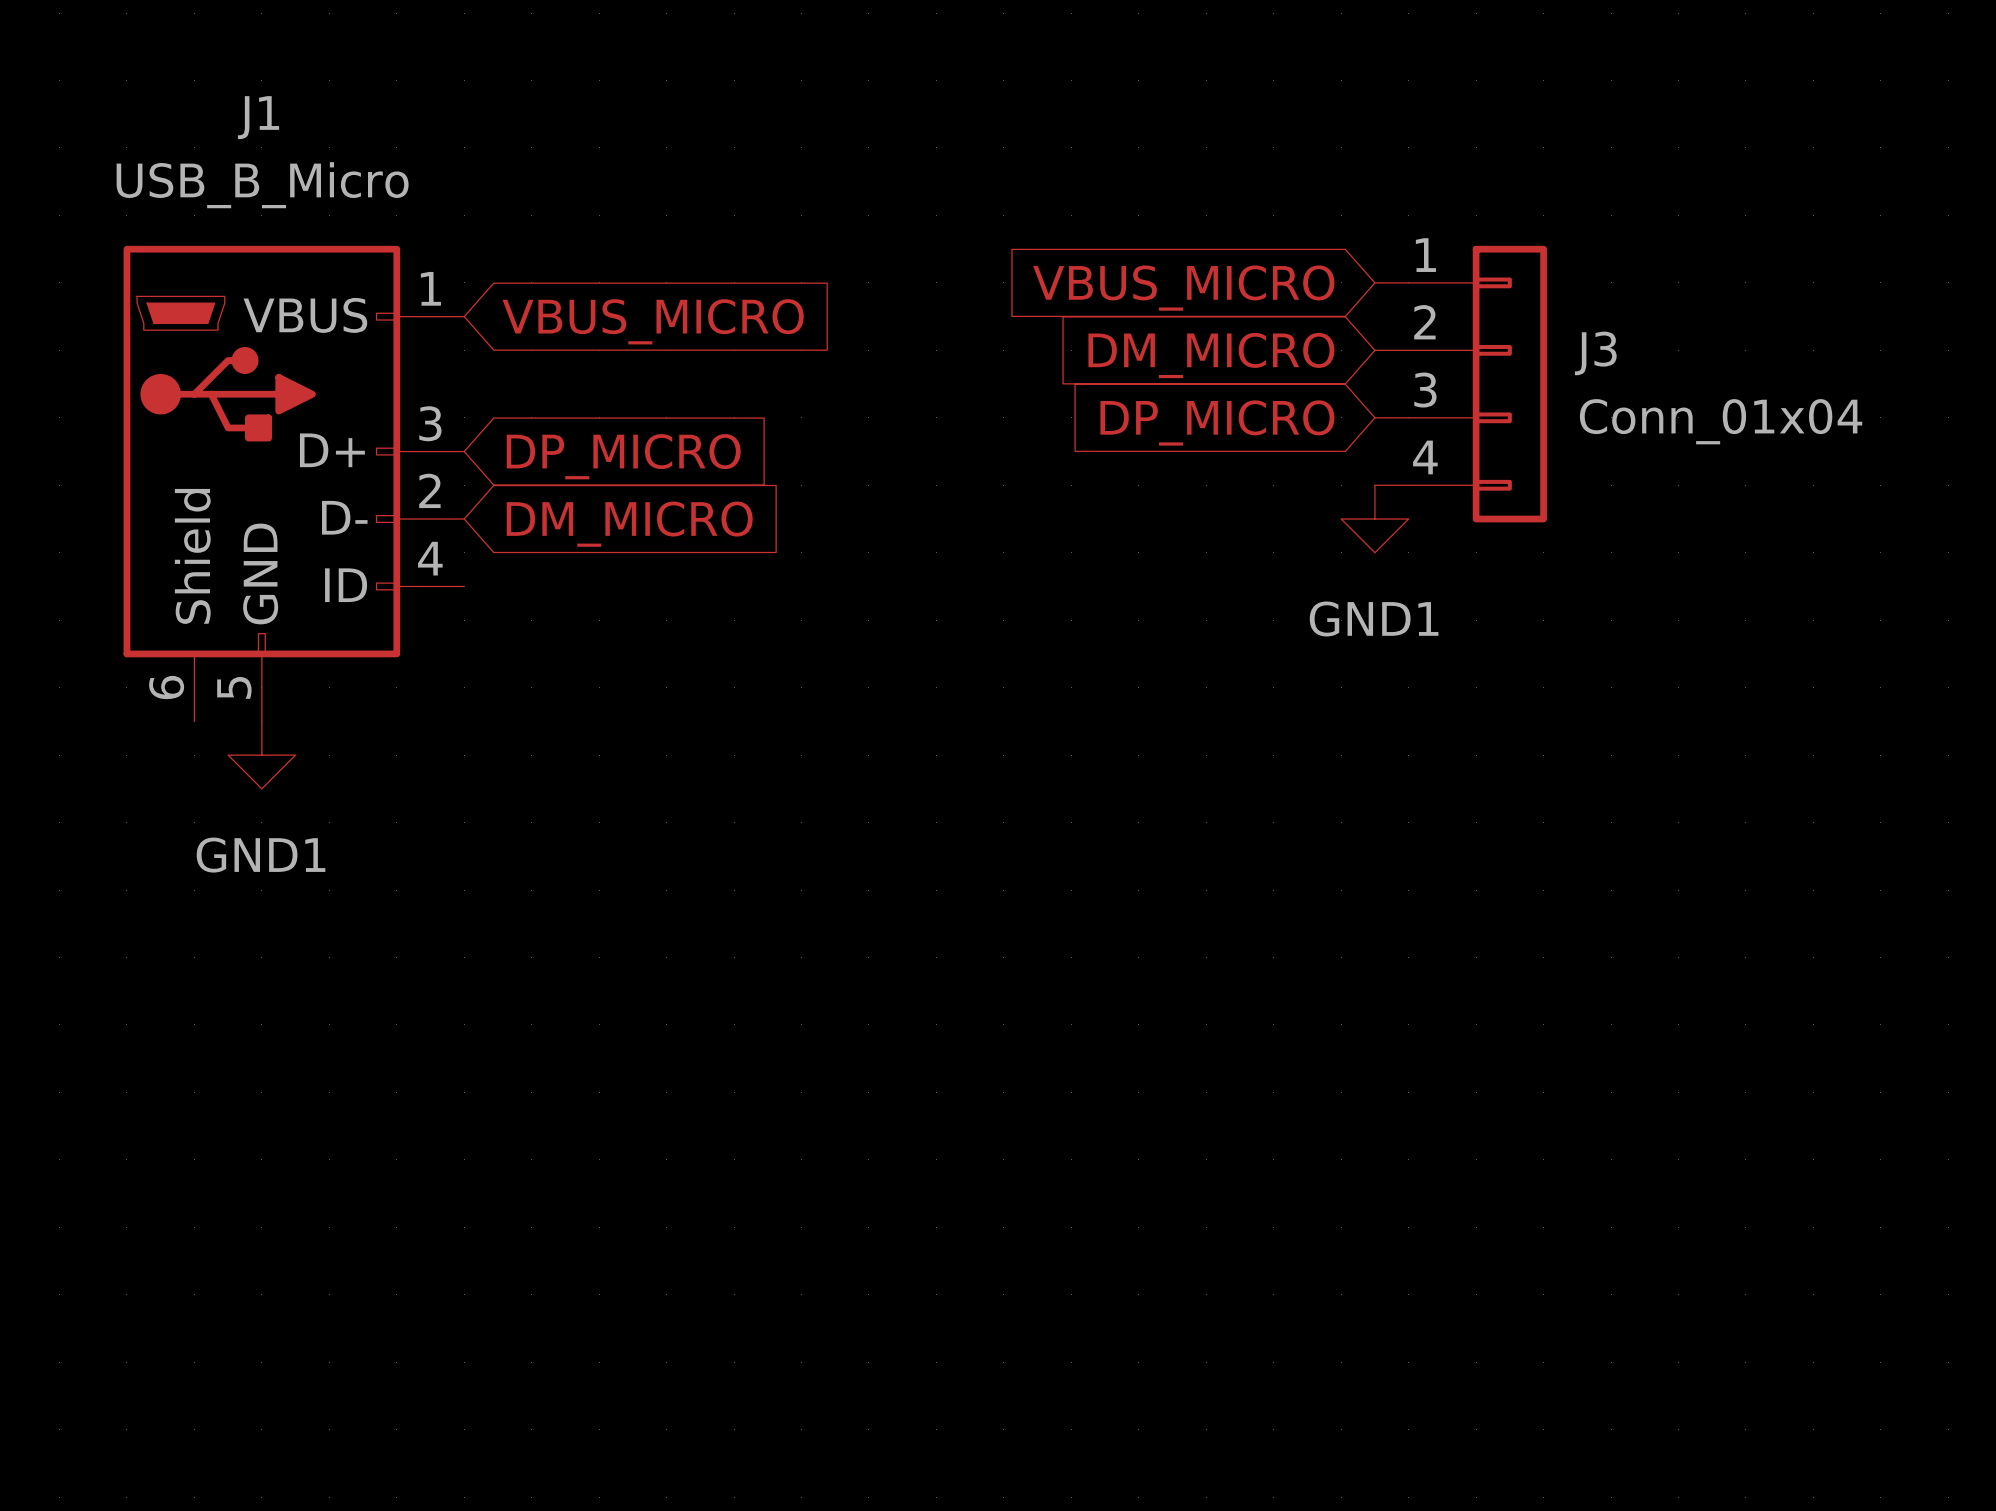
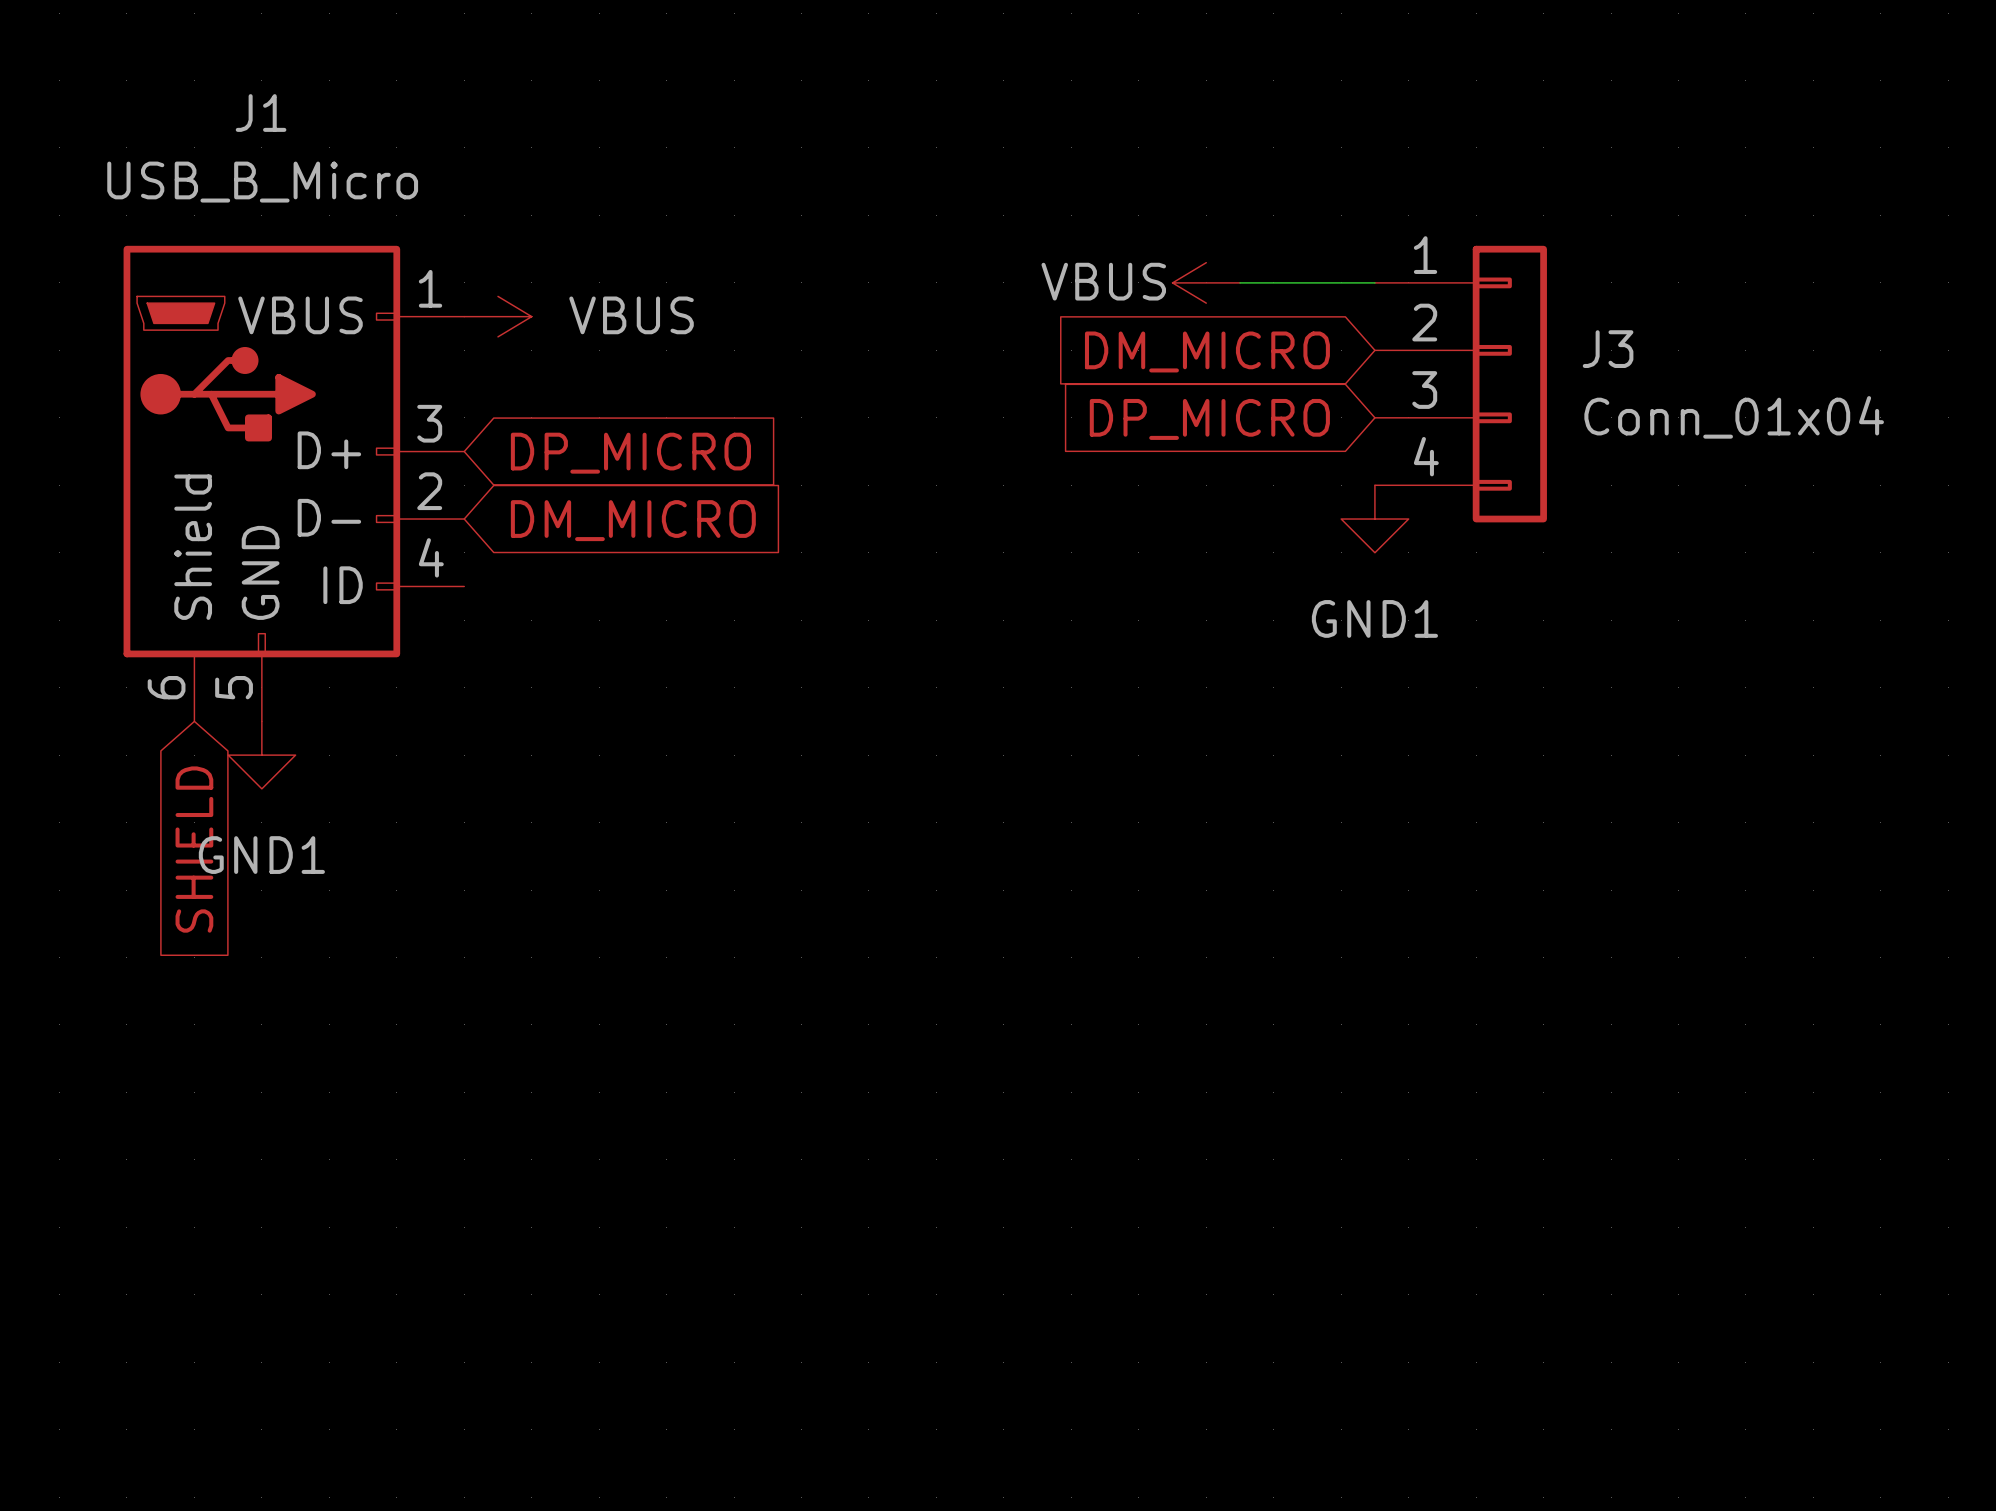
power symbol: none -> VBUS (1206, 282)
wire: none -> (1240, 282) (1374, 282)
global label: VBUS_MICRO (1183, 288) -> none
power symbol: none -> VBUS (497, 316)
global label: VBUS_MICRO (653, 321) -> none
global label: none -> SHIELD (194, 849)

